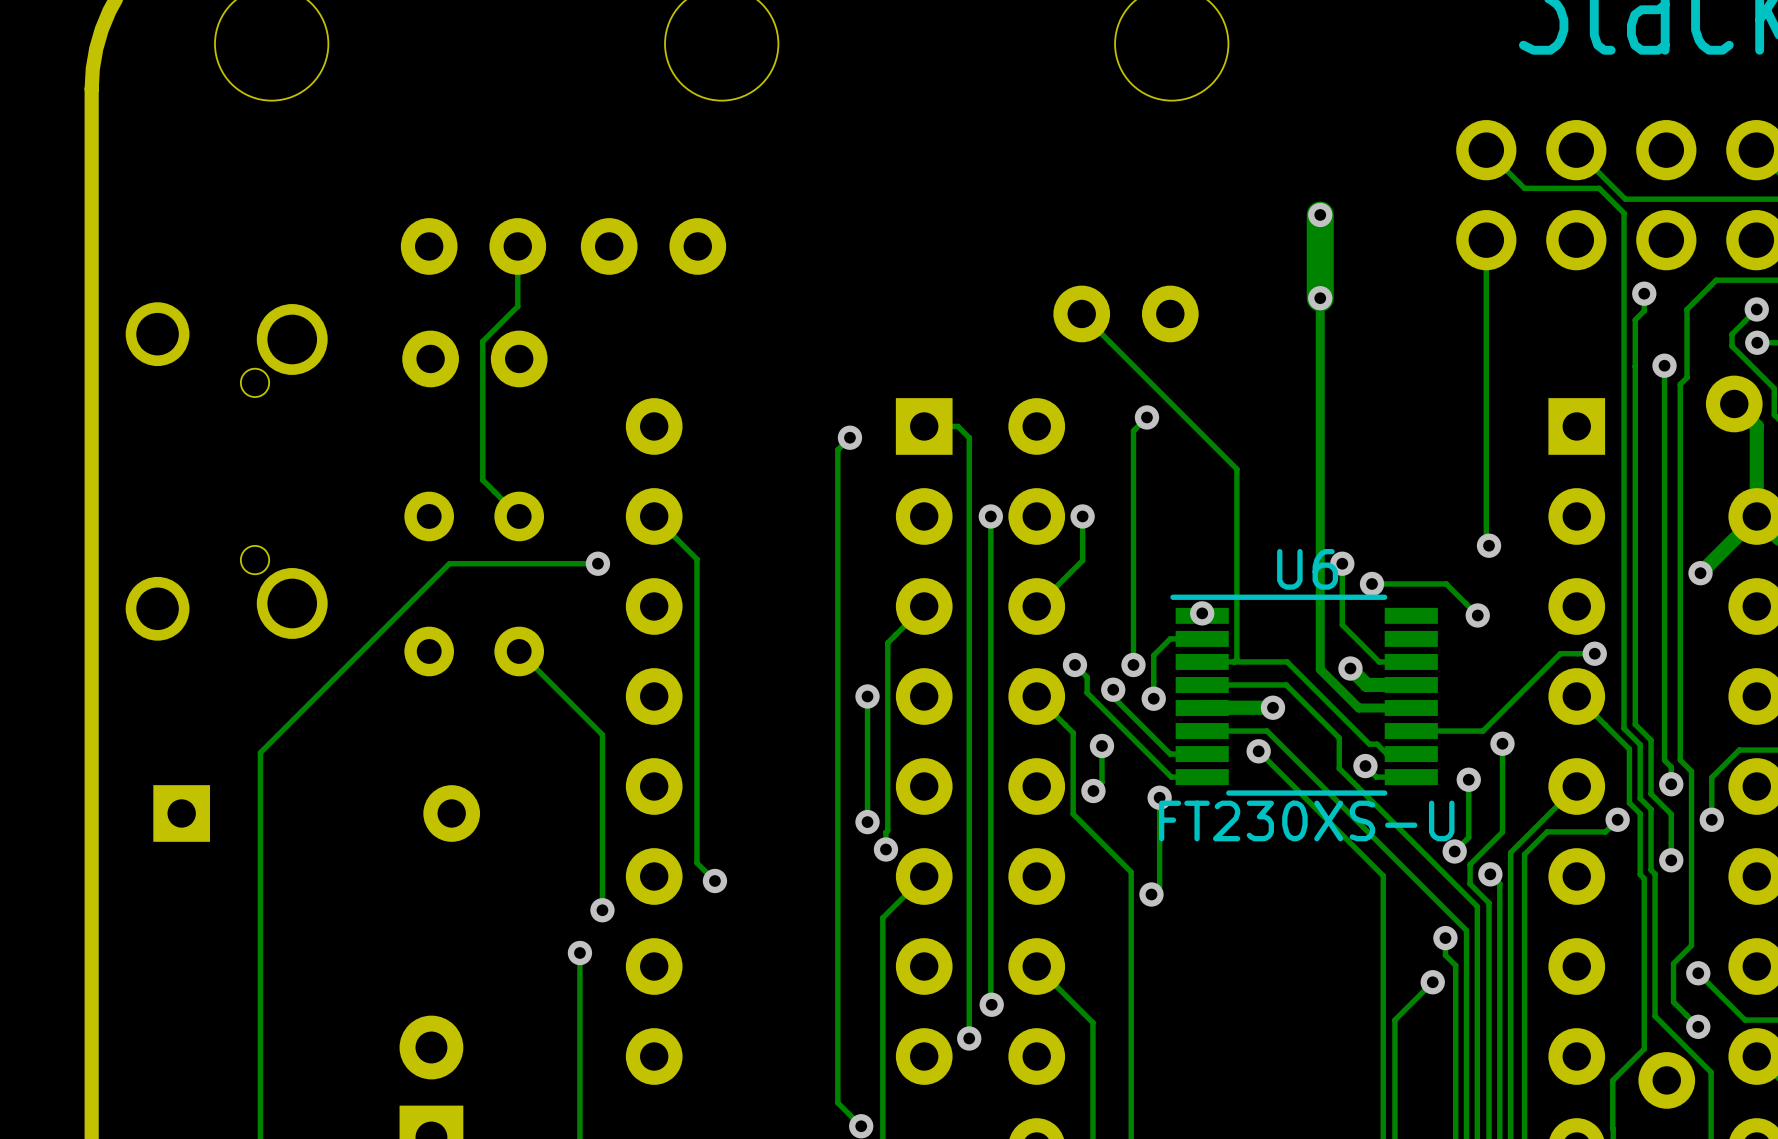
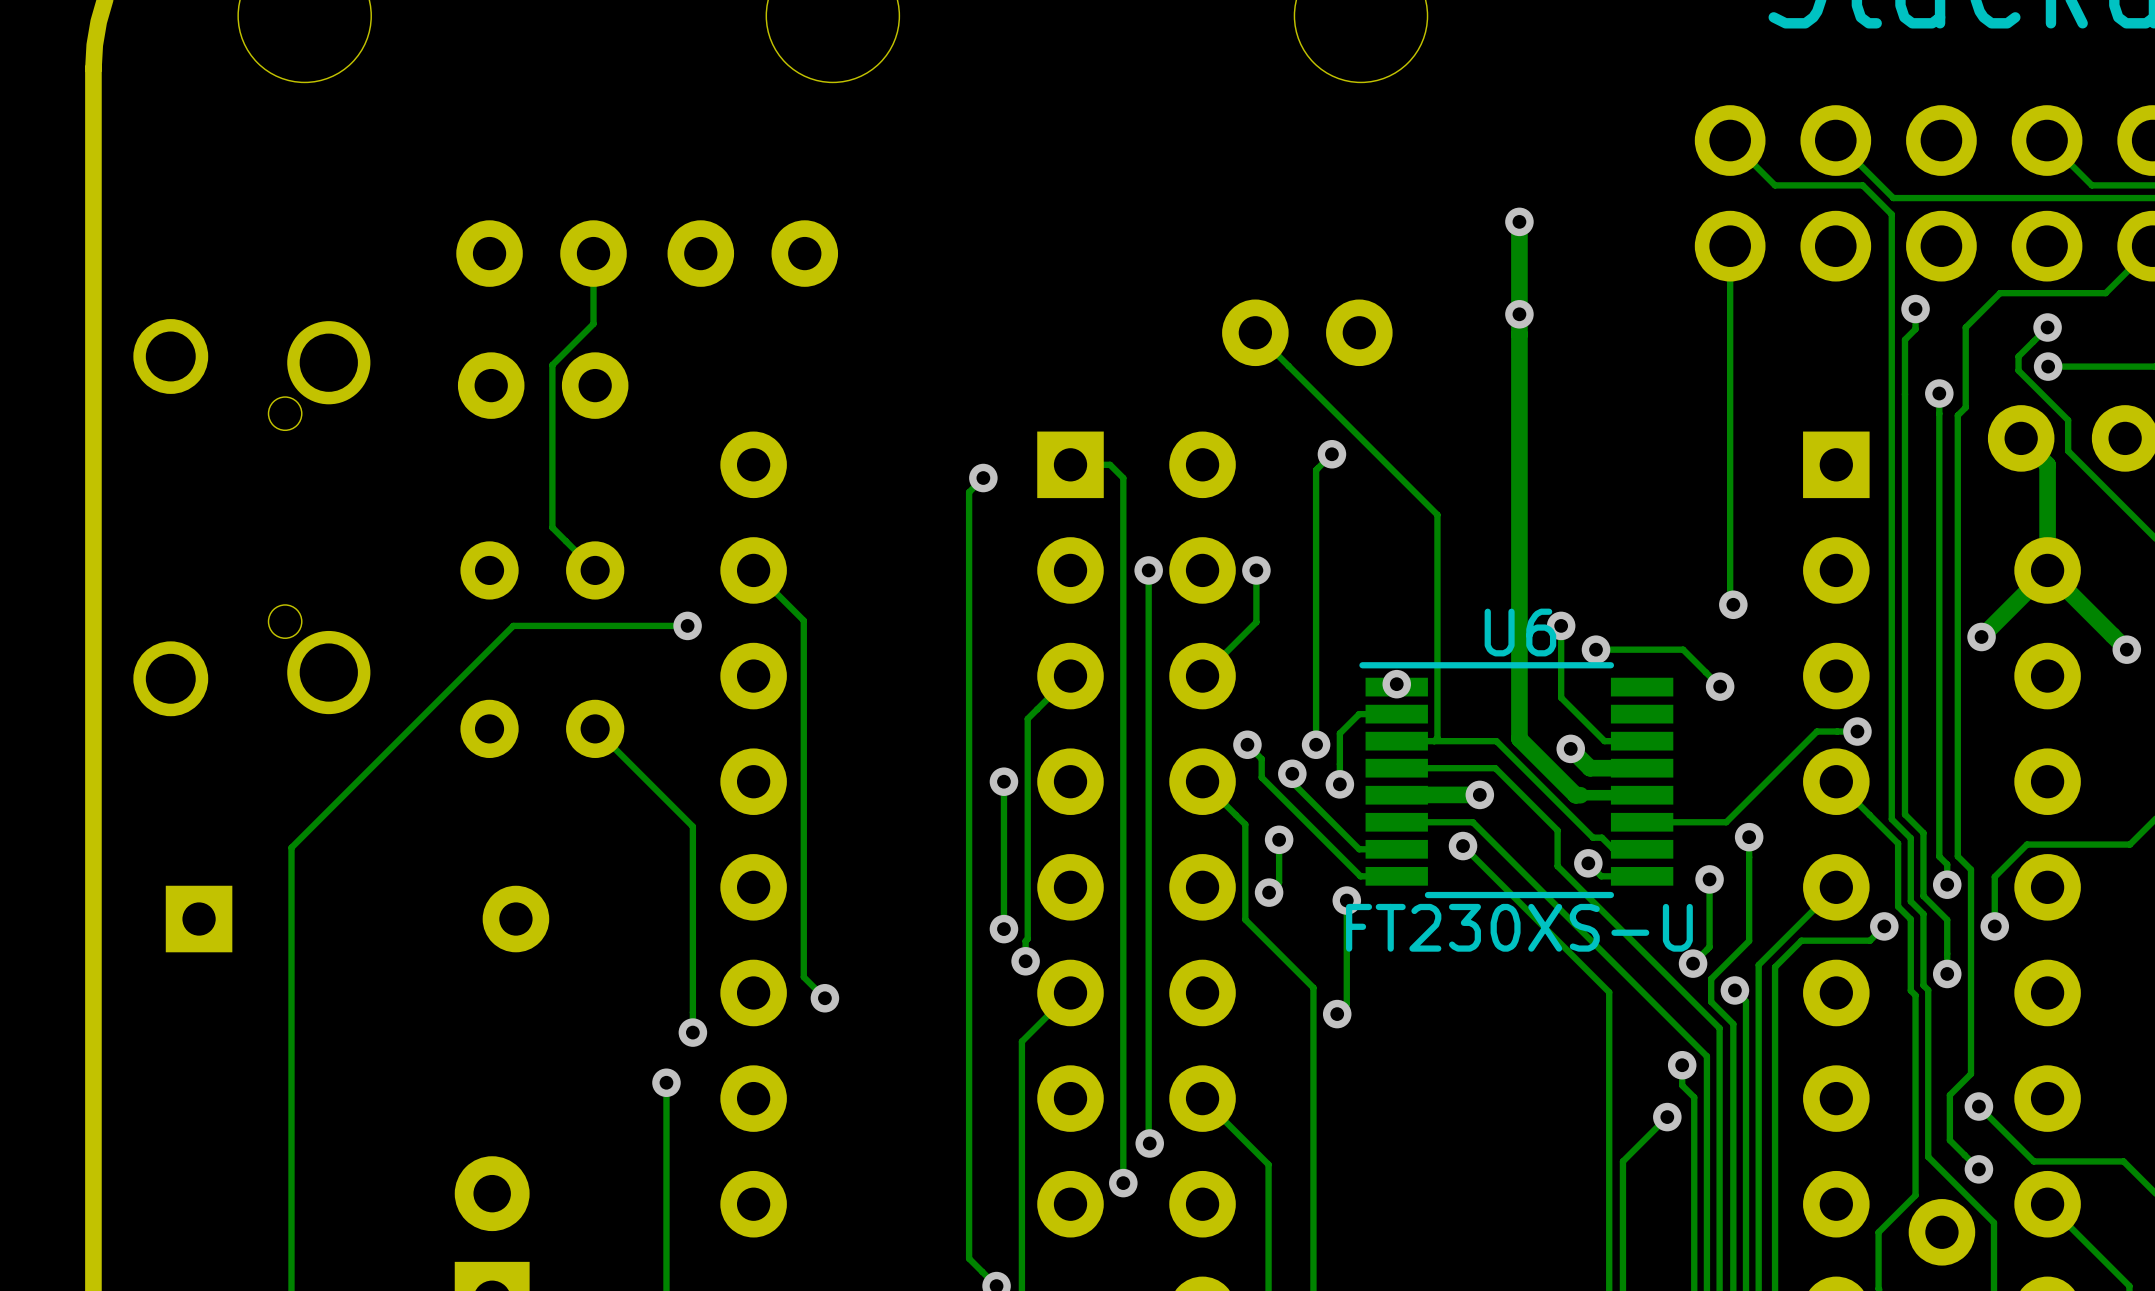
track: (1320, 214) (1320, 669) (1358, 708) -> (1519, 221) (1519, 738) (1575, 795) (1580, 795)
via position: (1320, 214) -> (1519, 221)
via position: (1320, 298) -> (1519, 314)

